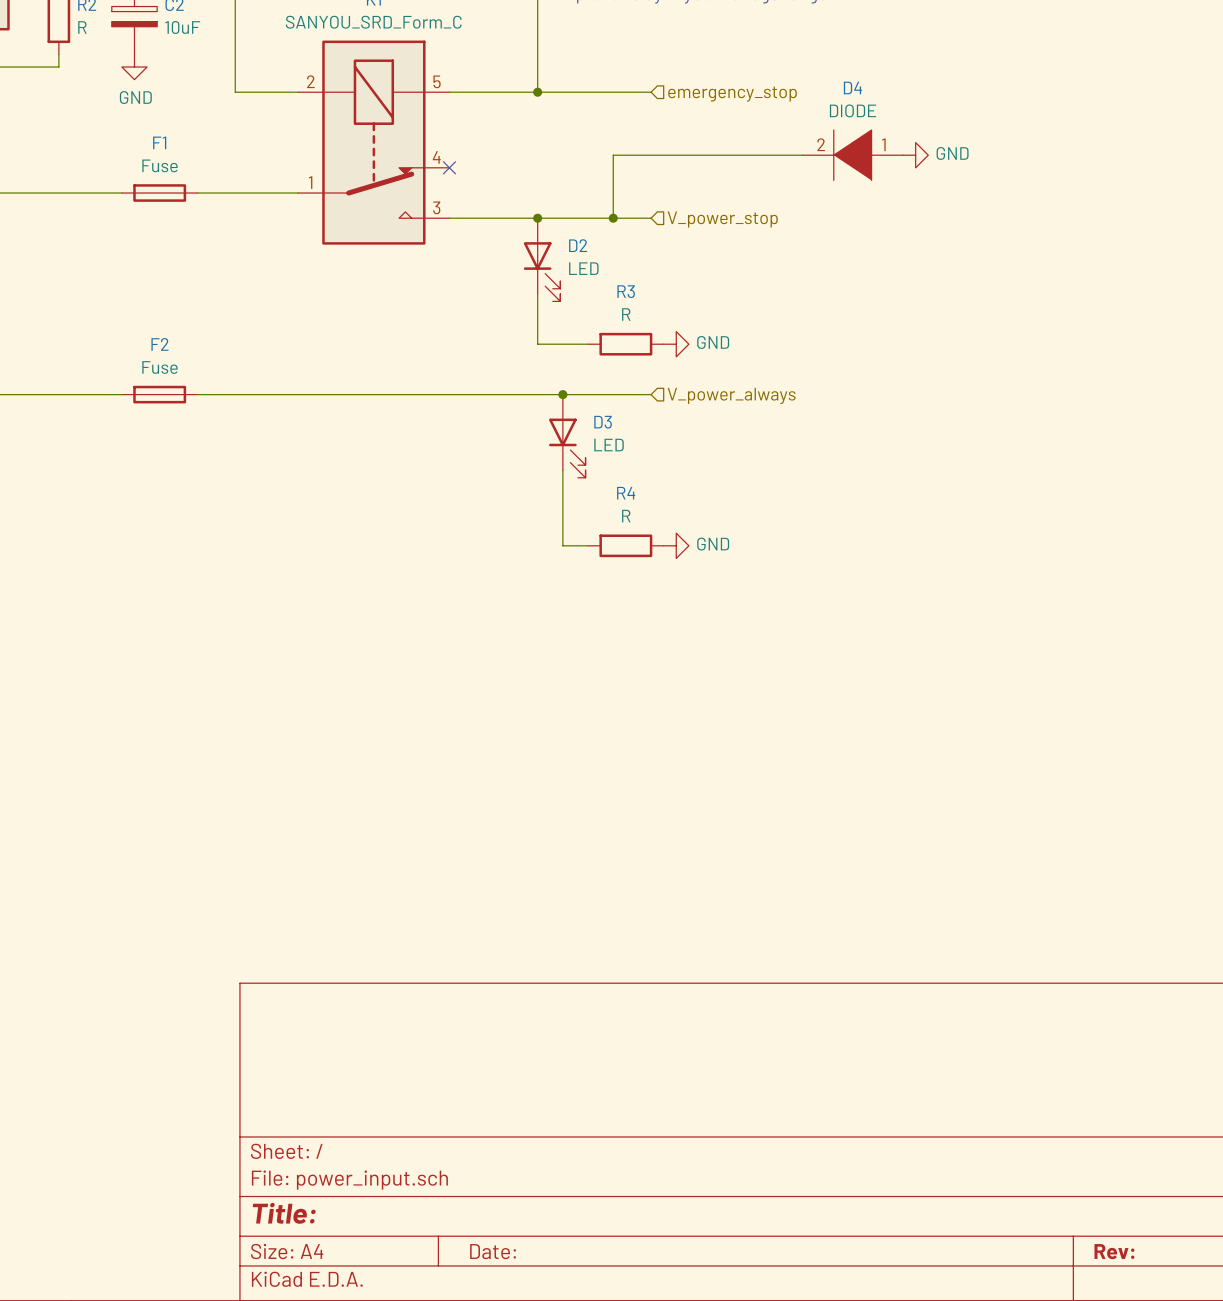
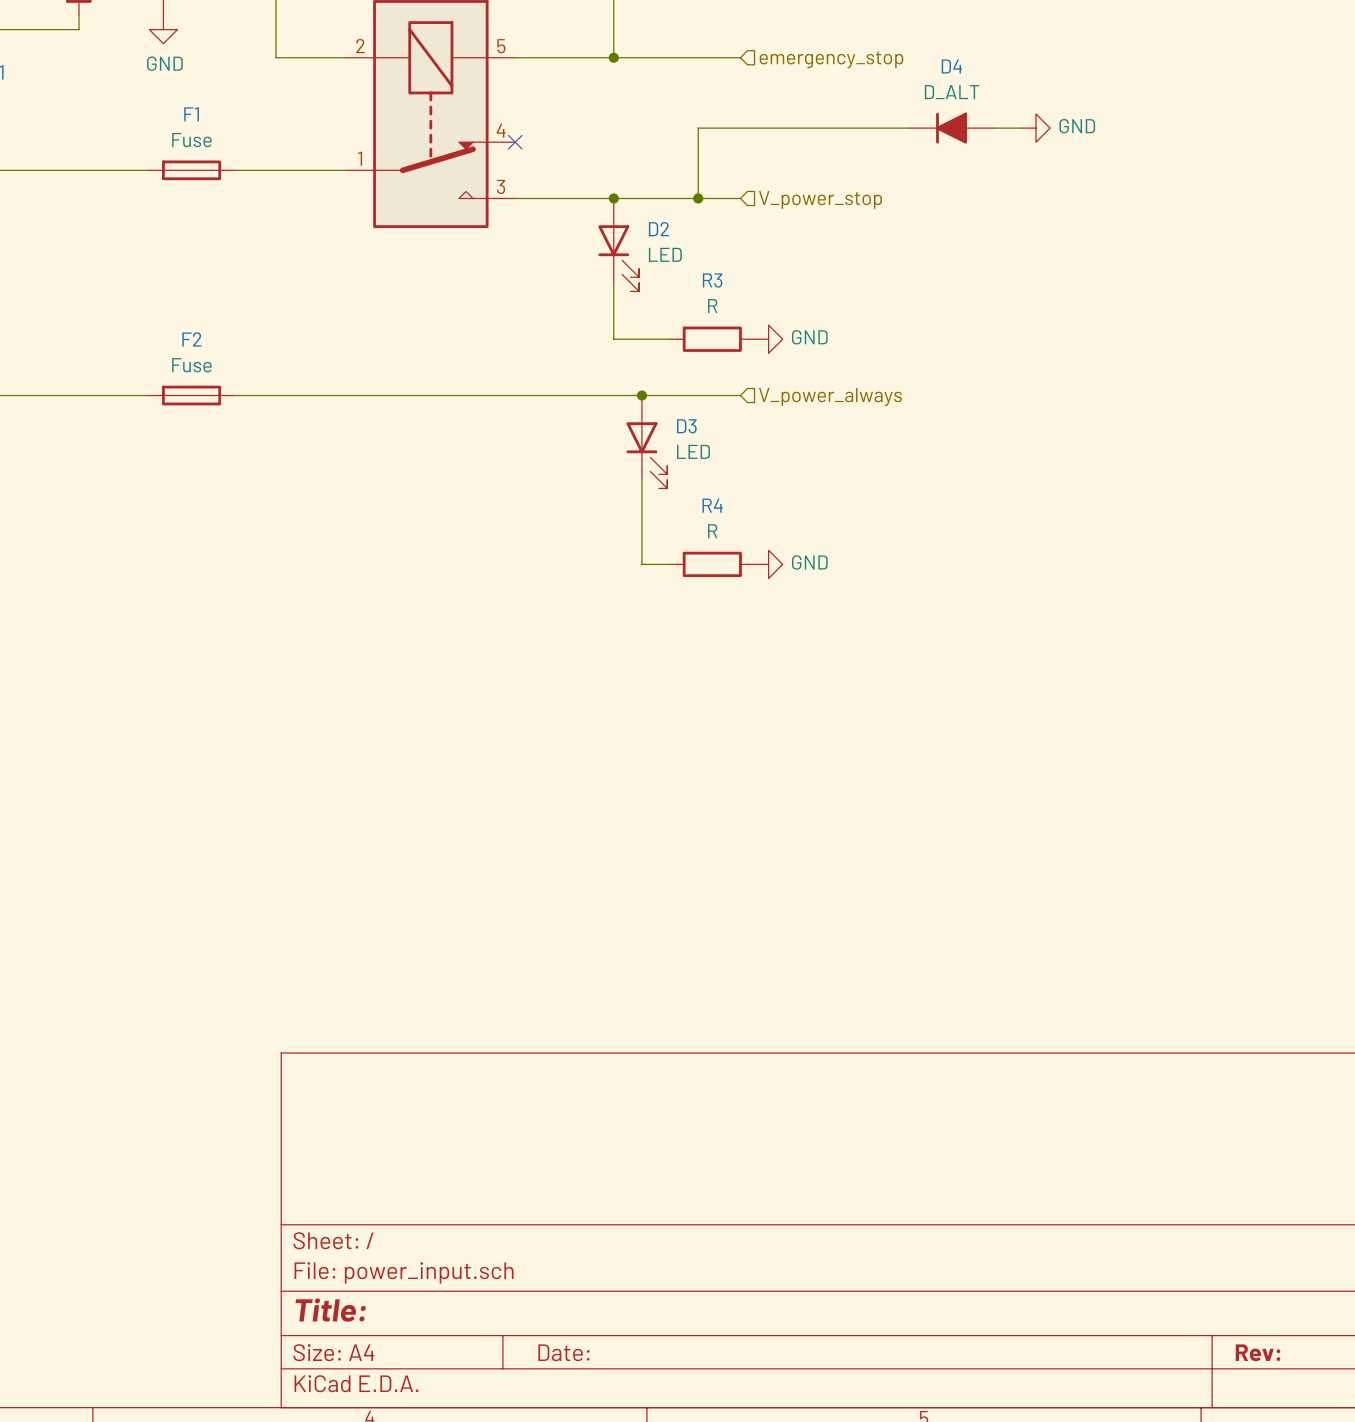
D4 value: DIODE (853, 110) -> D_ALT (952, 92)
D4 symbol: [802, 130, 904, 181] -> [909, 112, 994, 144]

